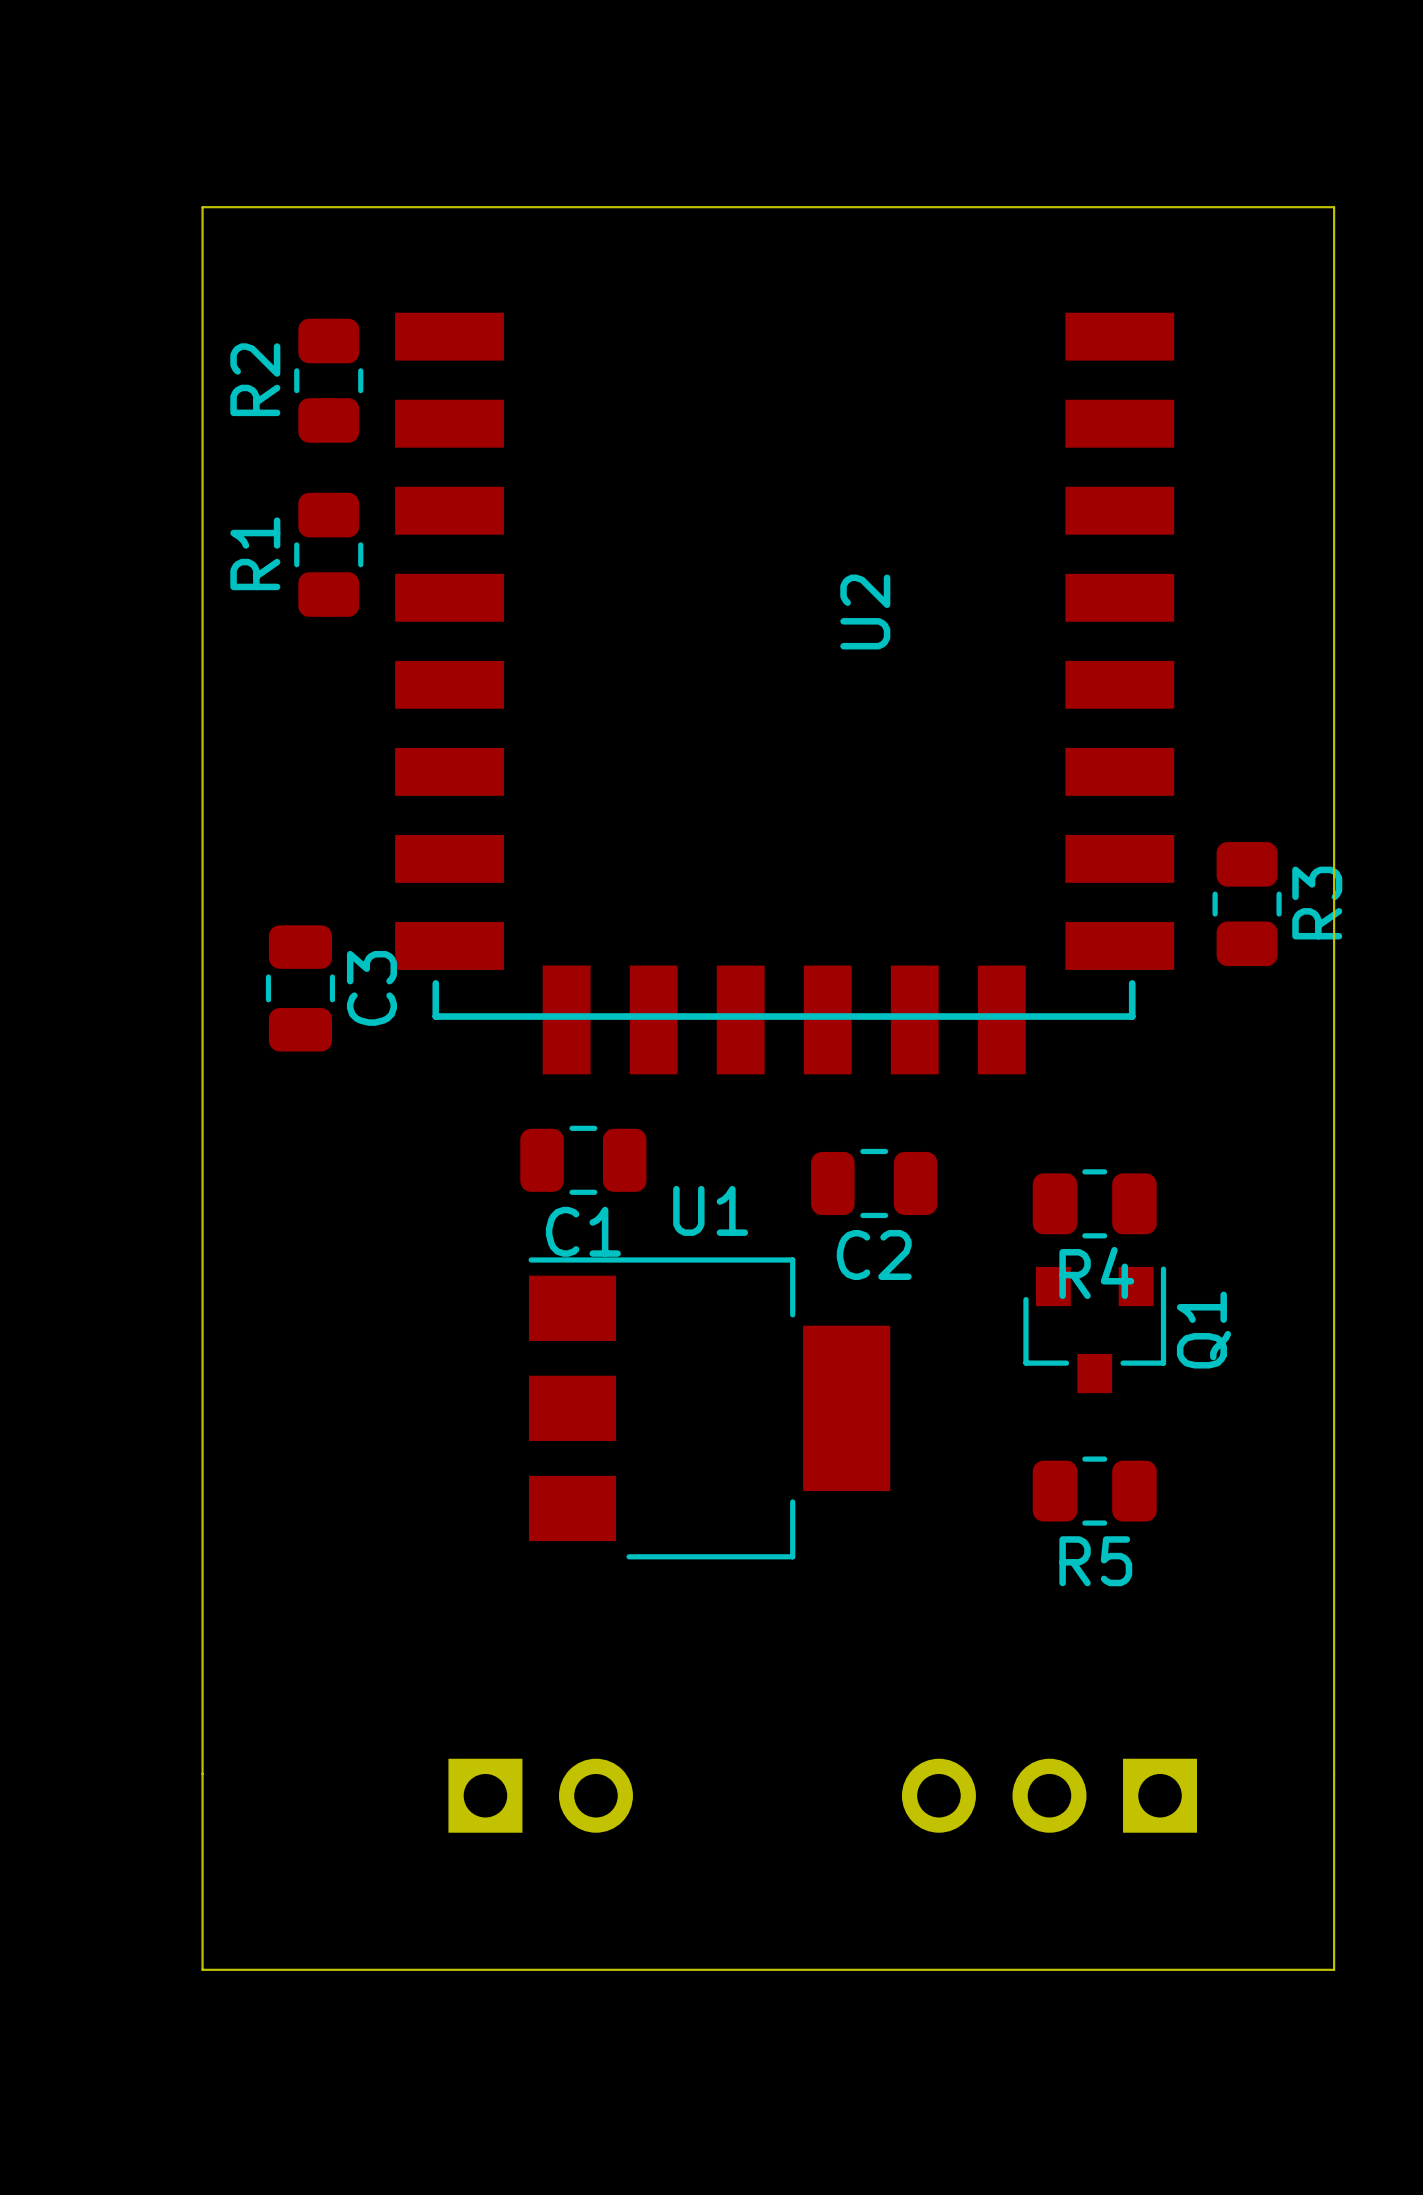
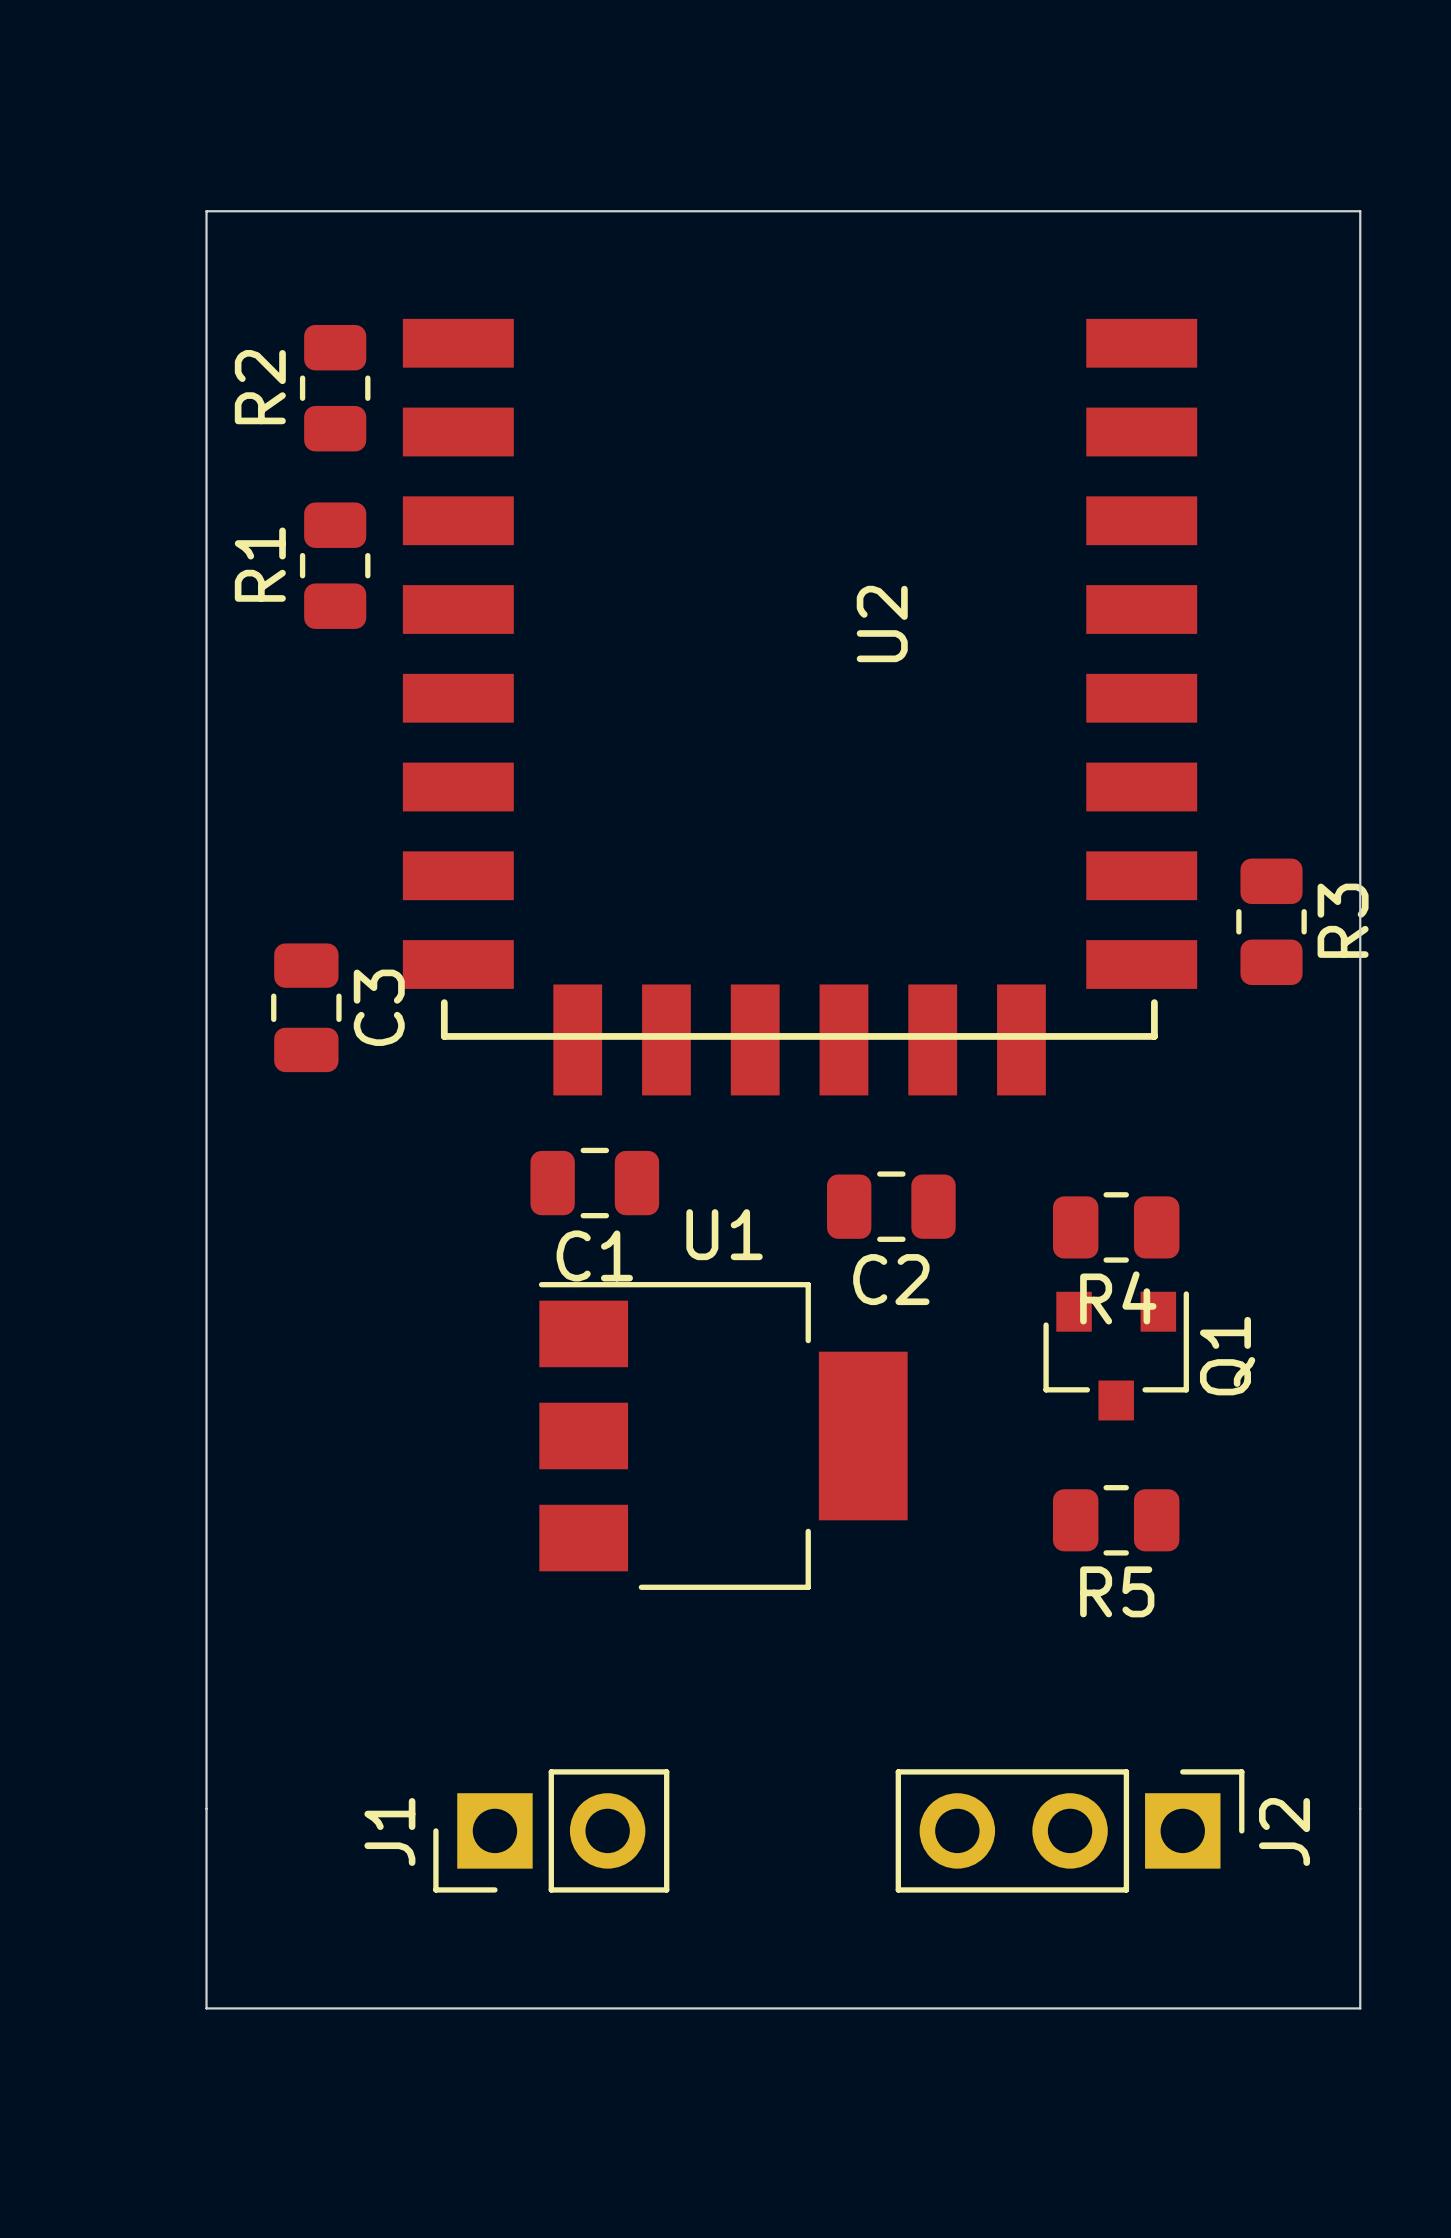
J1 side: bottom (540, 1795) -> top (551, 1830)
J2 side: bottom (1049, 1795) -> top (1070, 1830)

